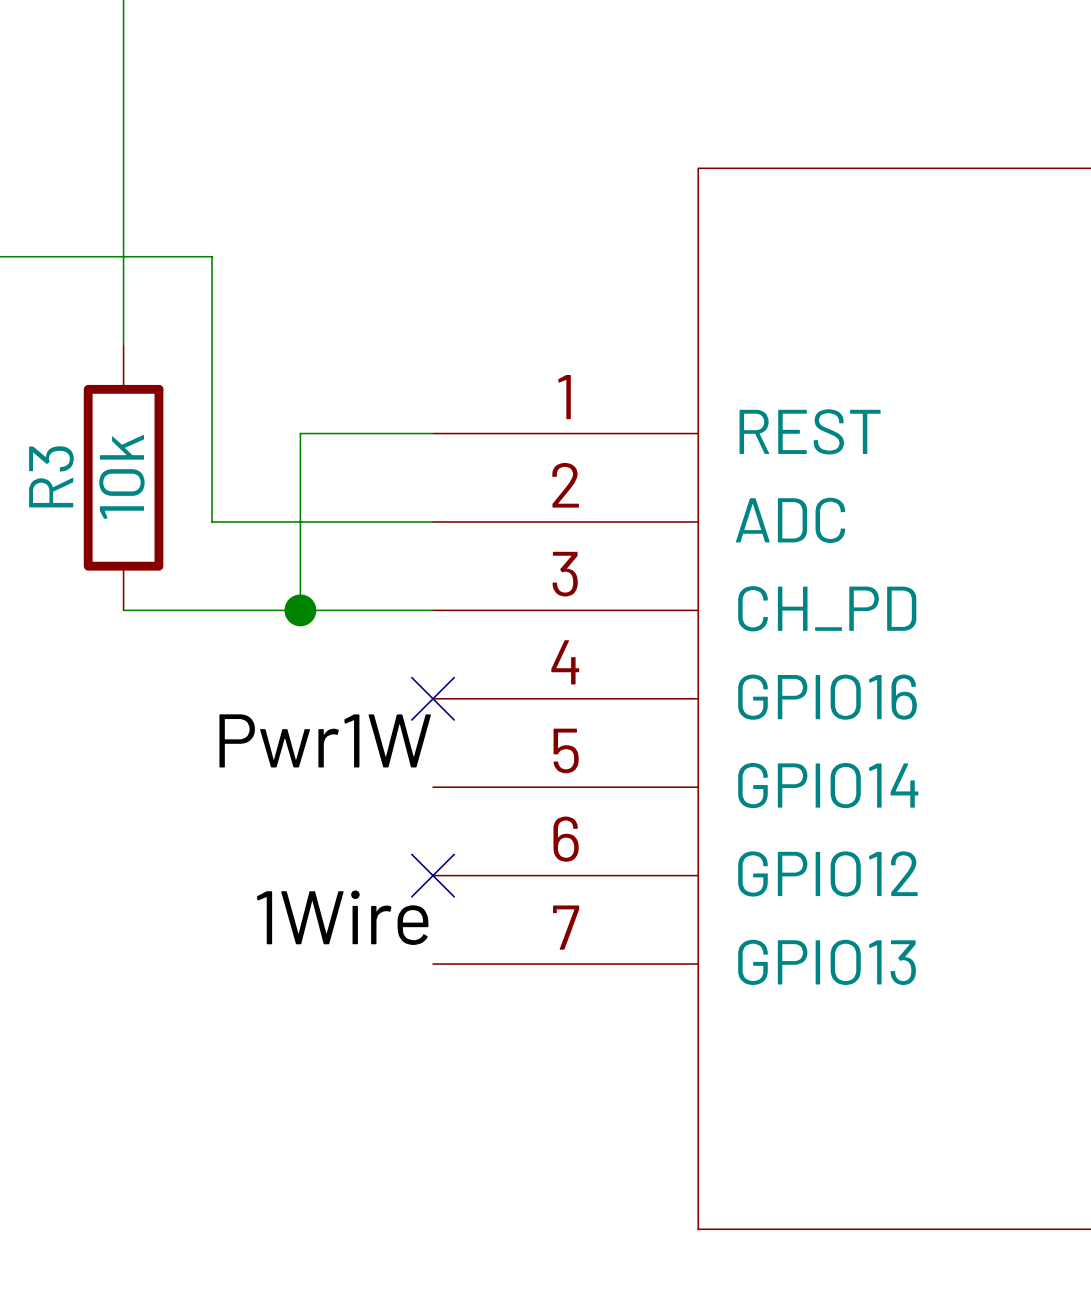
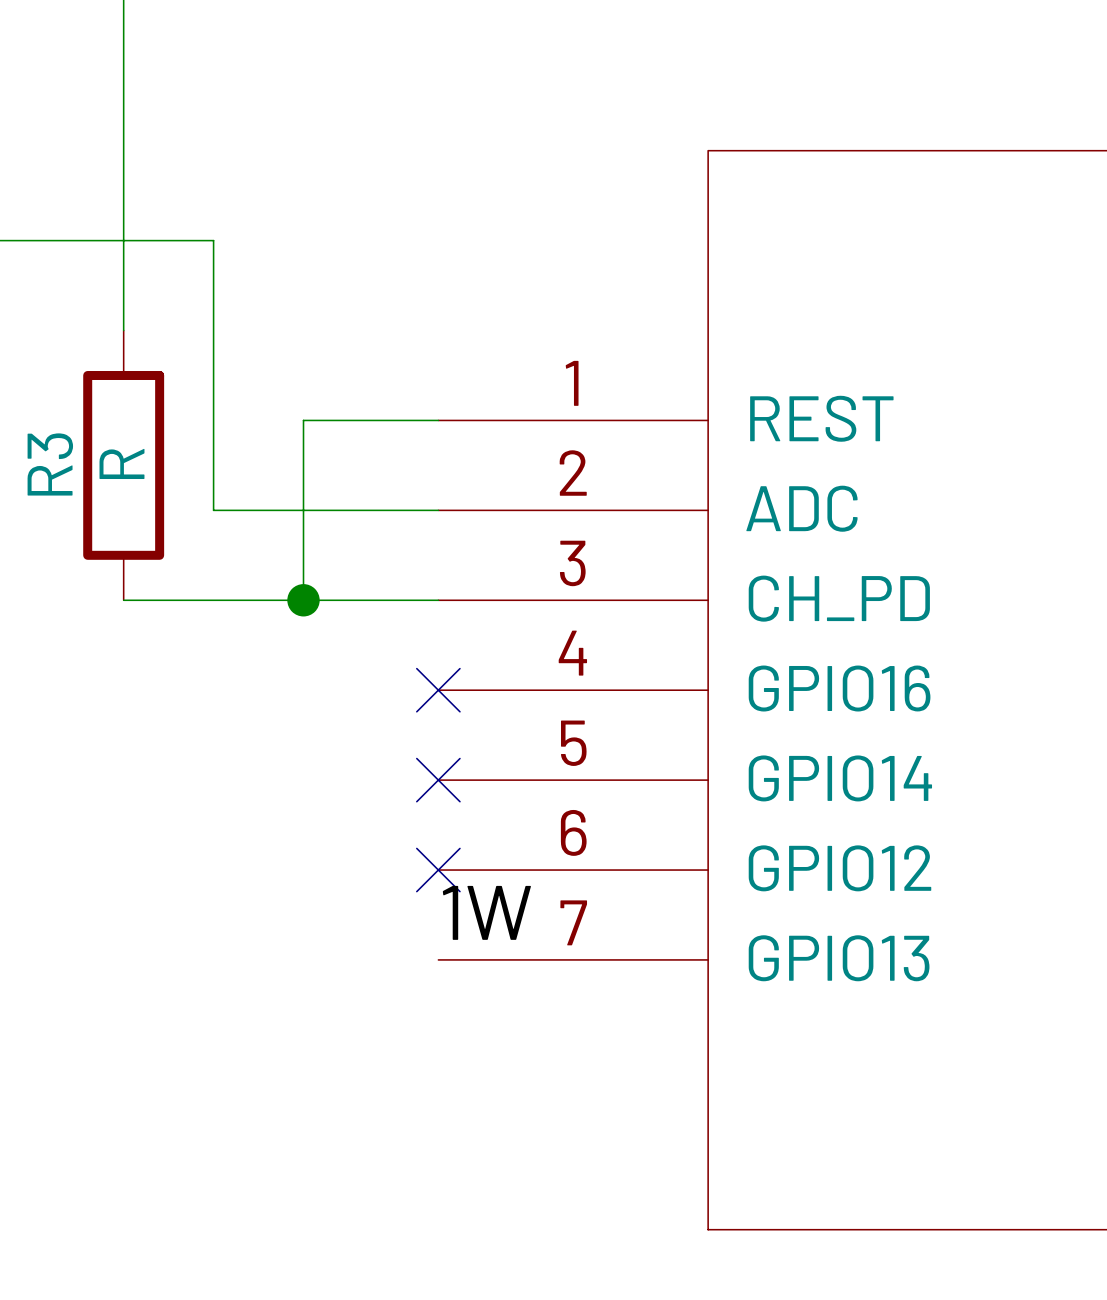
R3 value: 10k (121, 476) -> R (121, 463)
label: Pwr1W (325, 740) -> none
no-connect mark: none -> (438, 780)
label: 1Wire (342, 917) -> 1W (486, 912)

